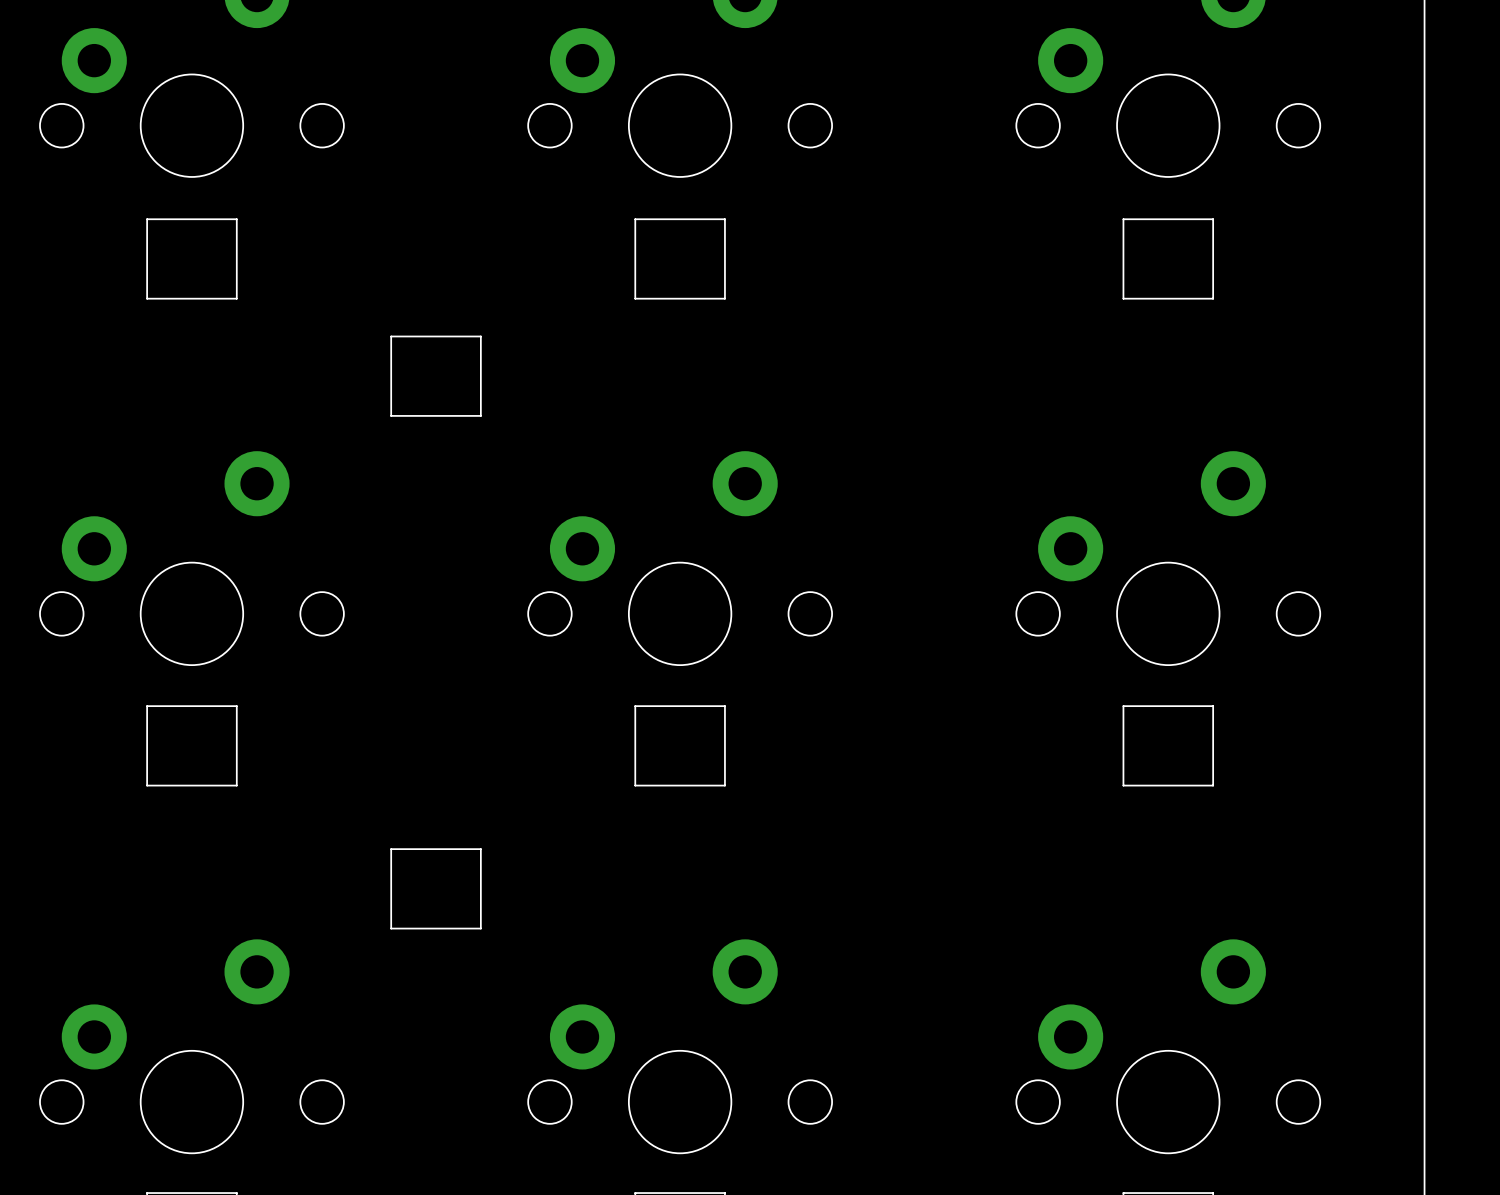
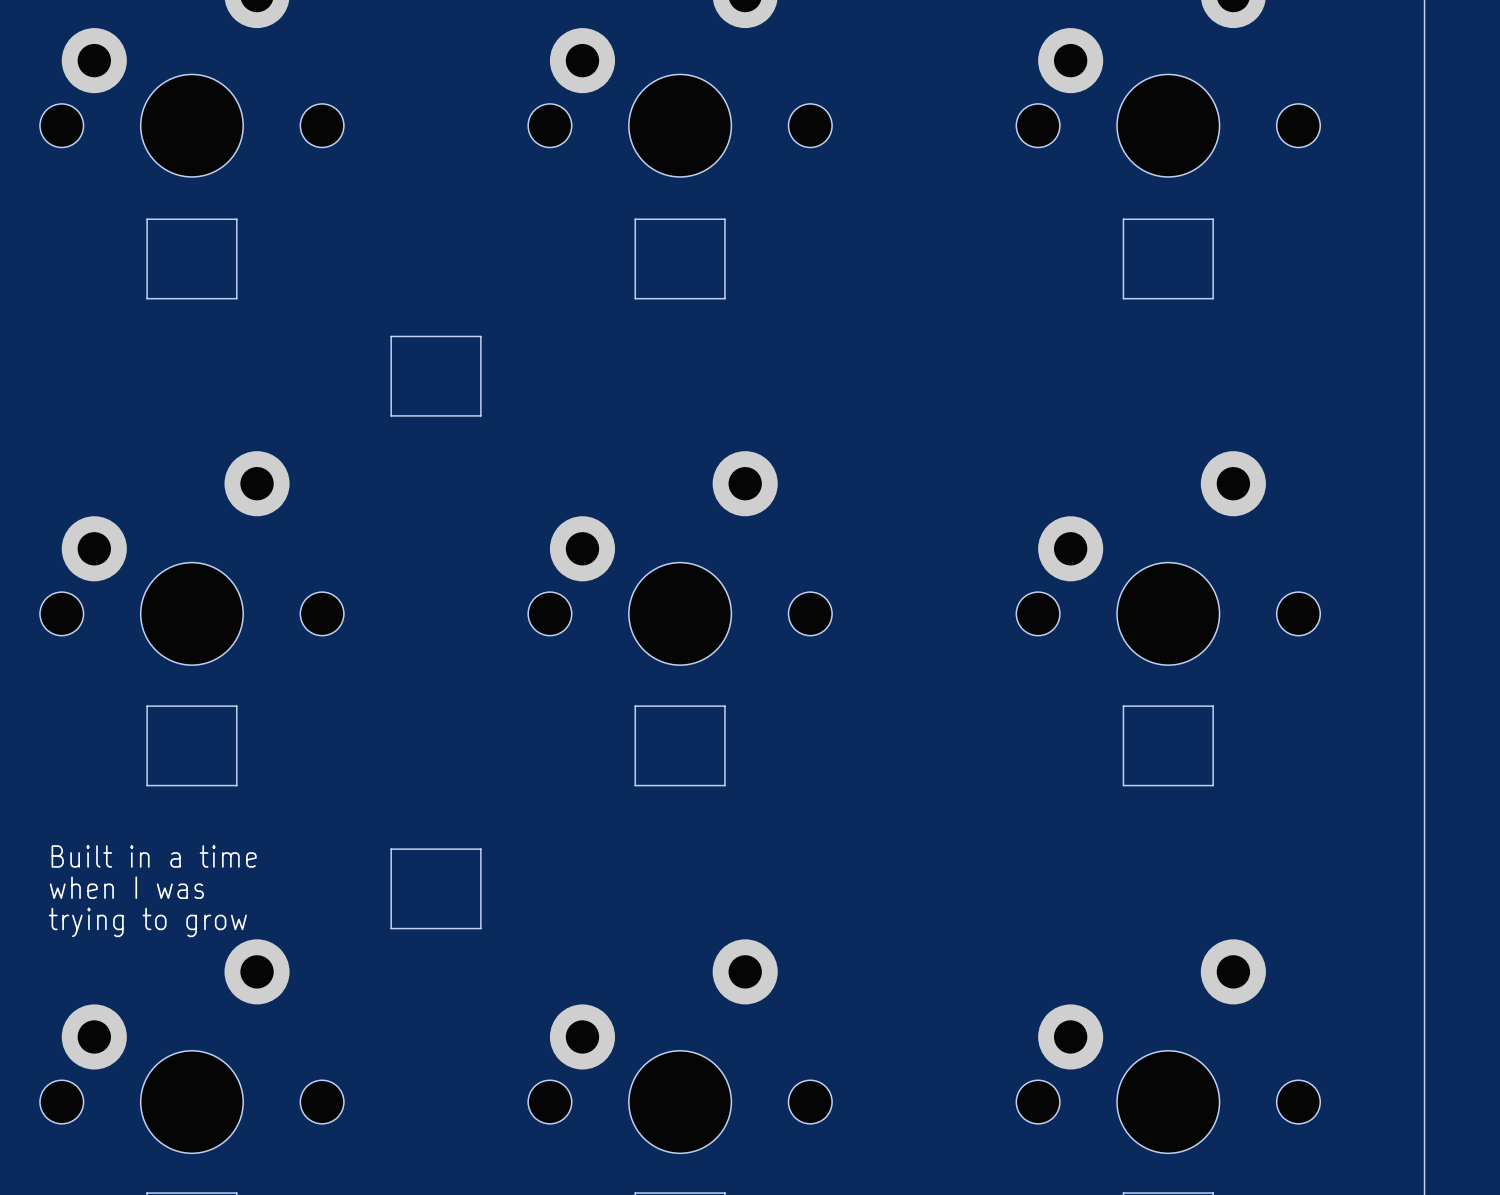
text: none -> Built in a time (154, 856)
text: none -> when I was (126, 887)
text: none -> trying to grow (147, 922)

